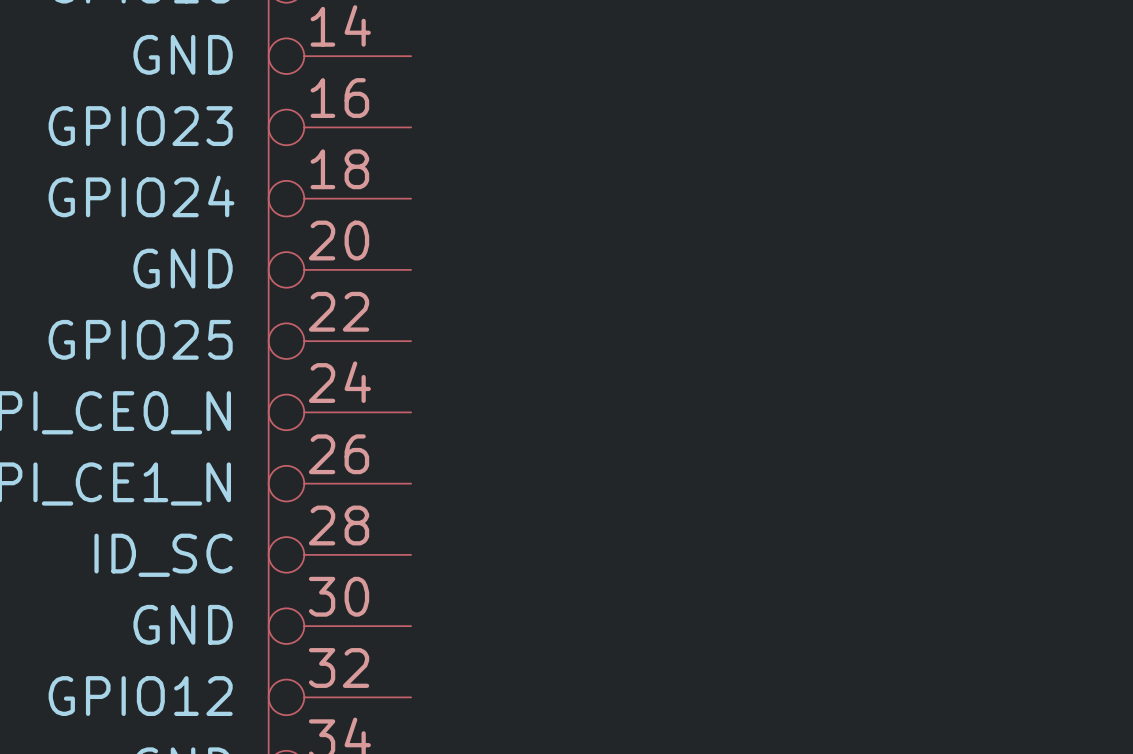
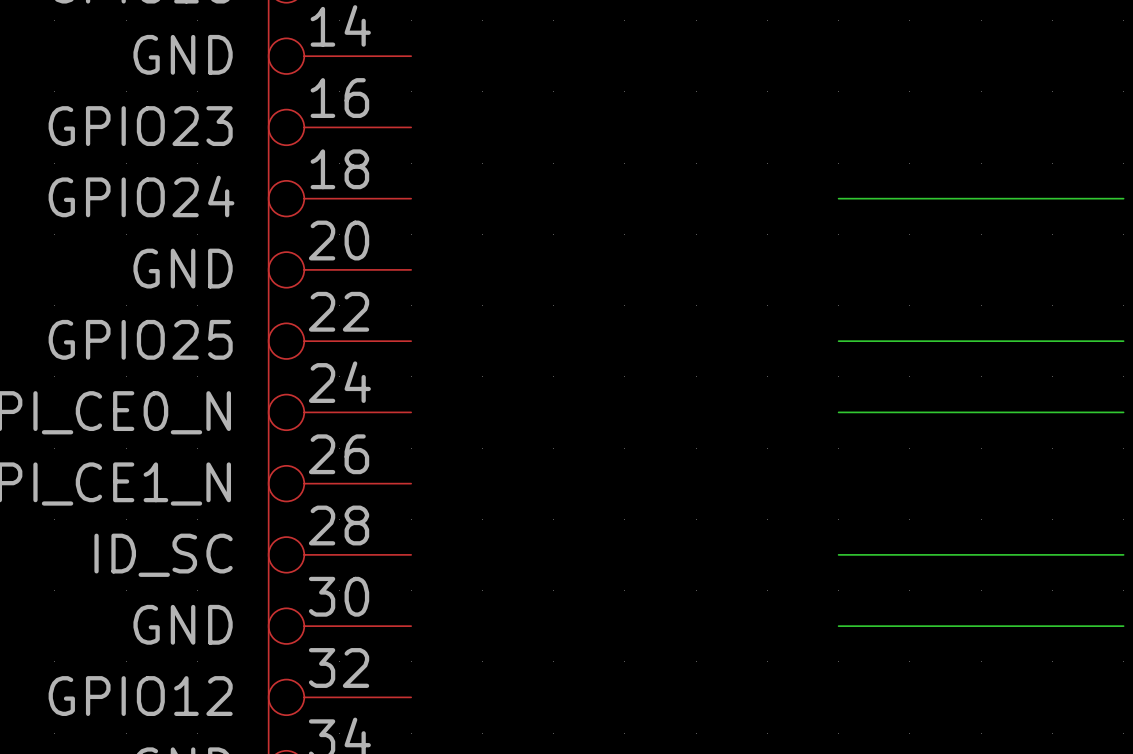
wire: none -> (838, 198) (1123, 198)
wire: none -> (838, 341) (1123, 341)
wire: none -> (838, 412) (1123, 412)
wire: none -> (838, 554) (1123, 554)
wire: none -> (838, 626) (1123, 626)

